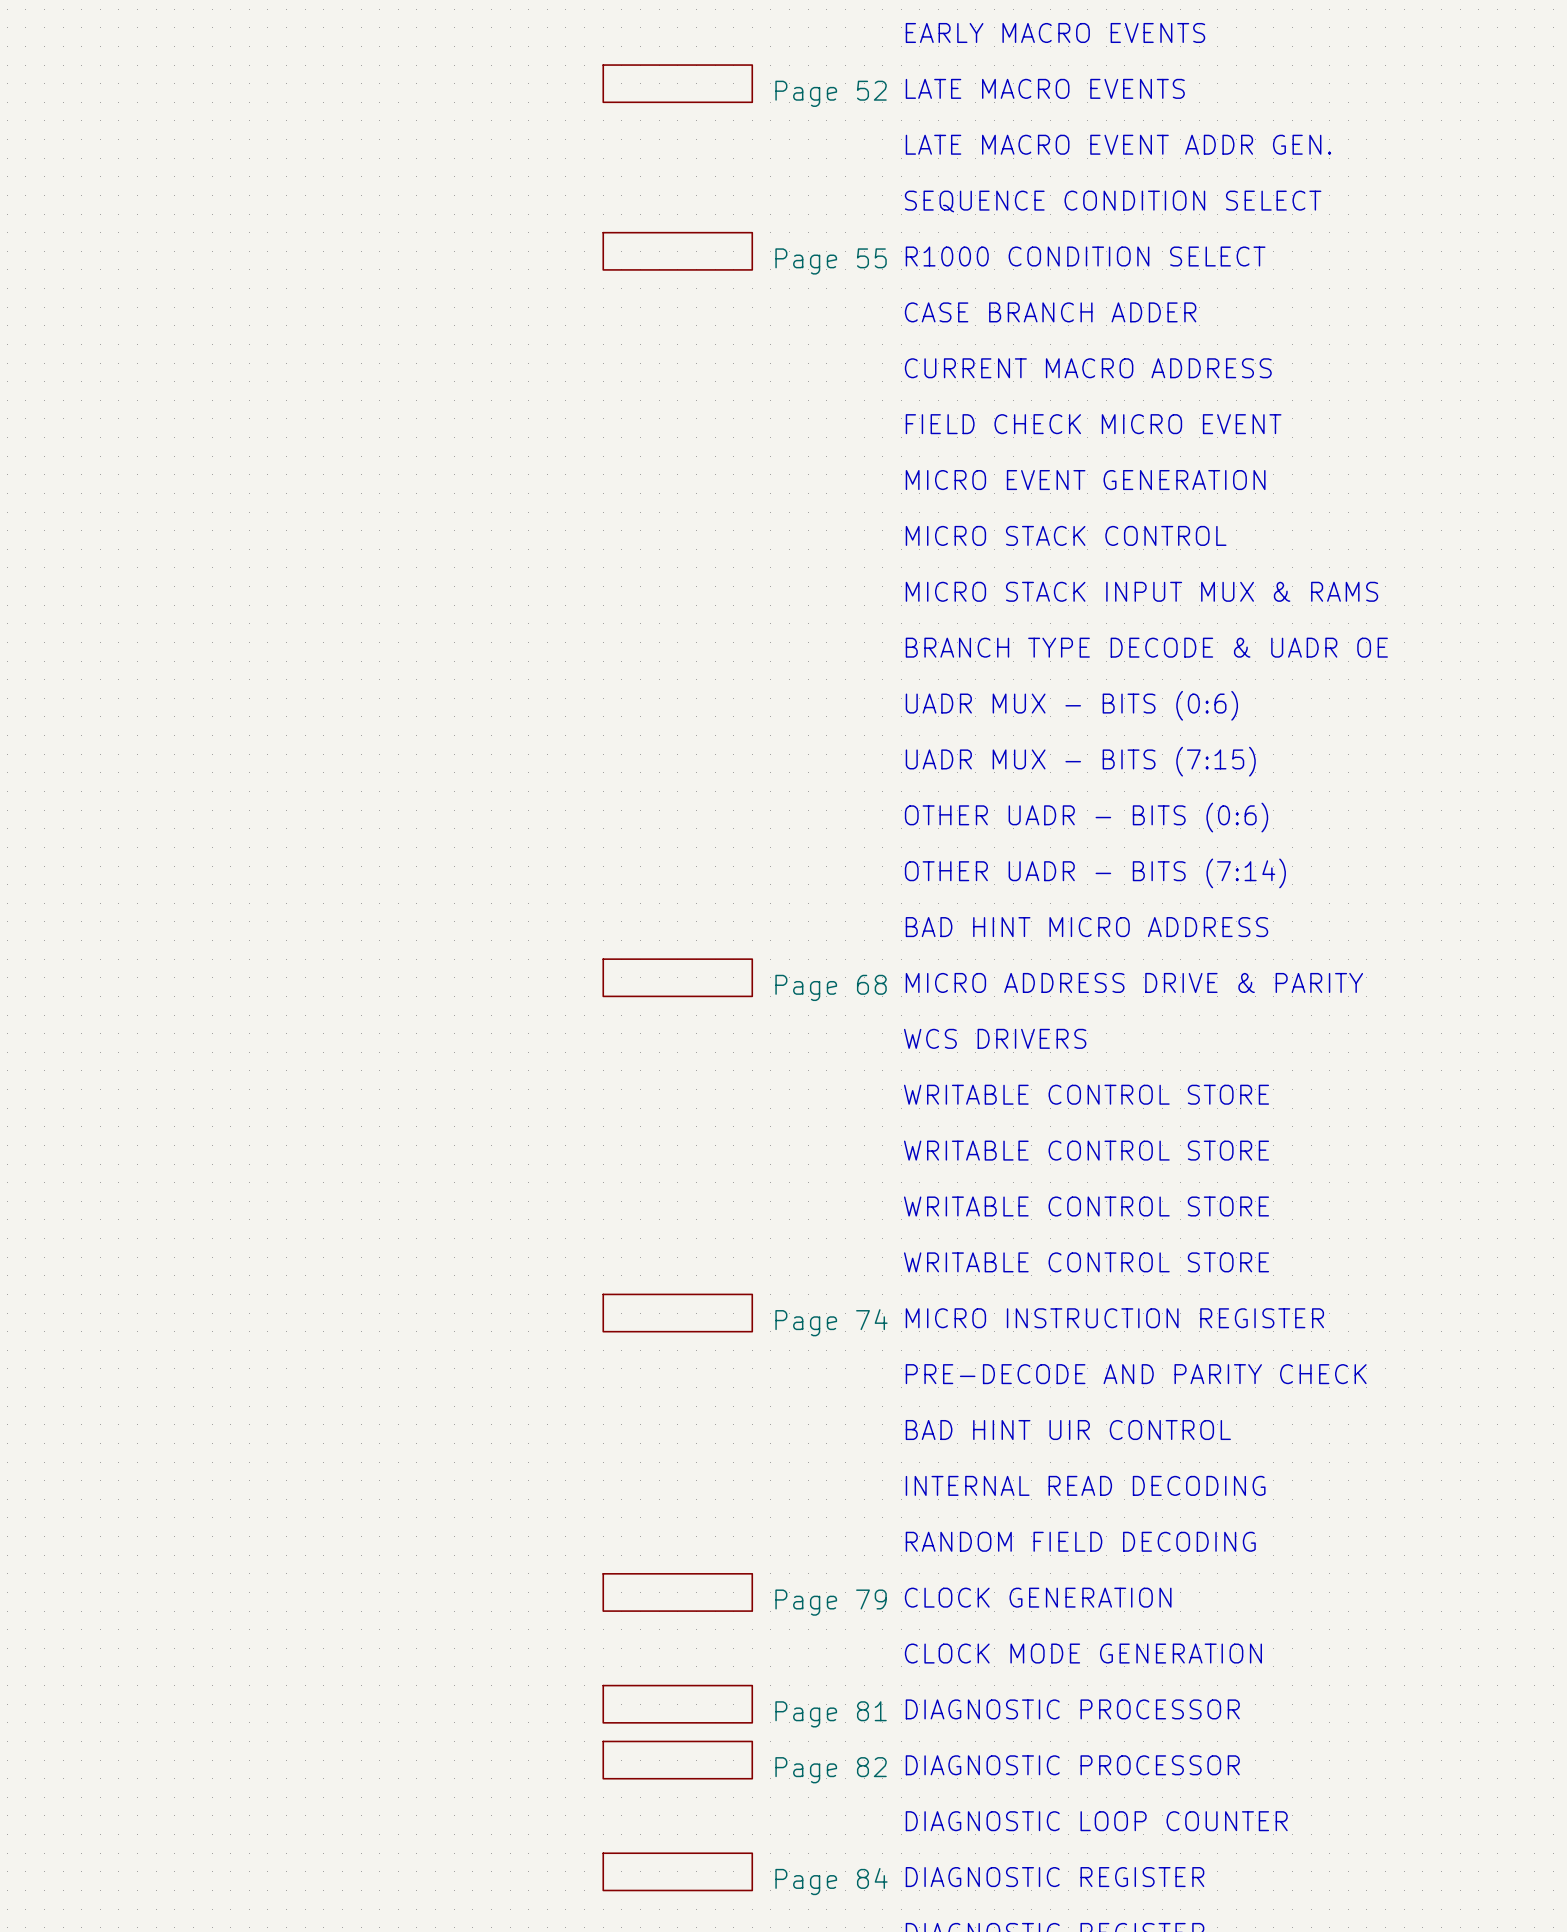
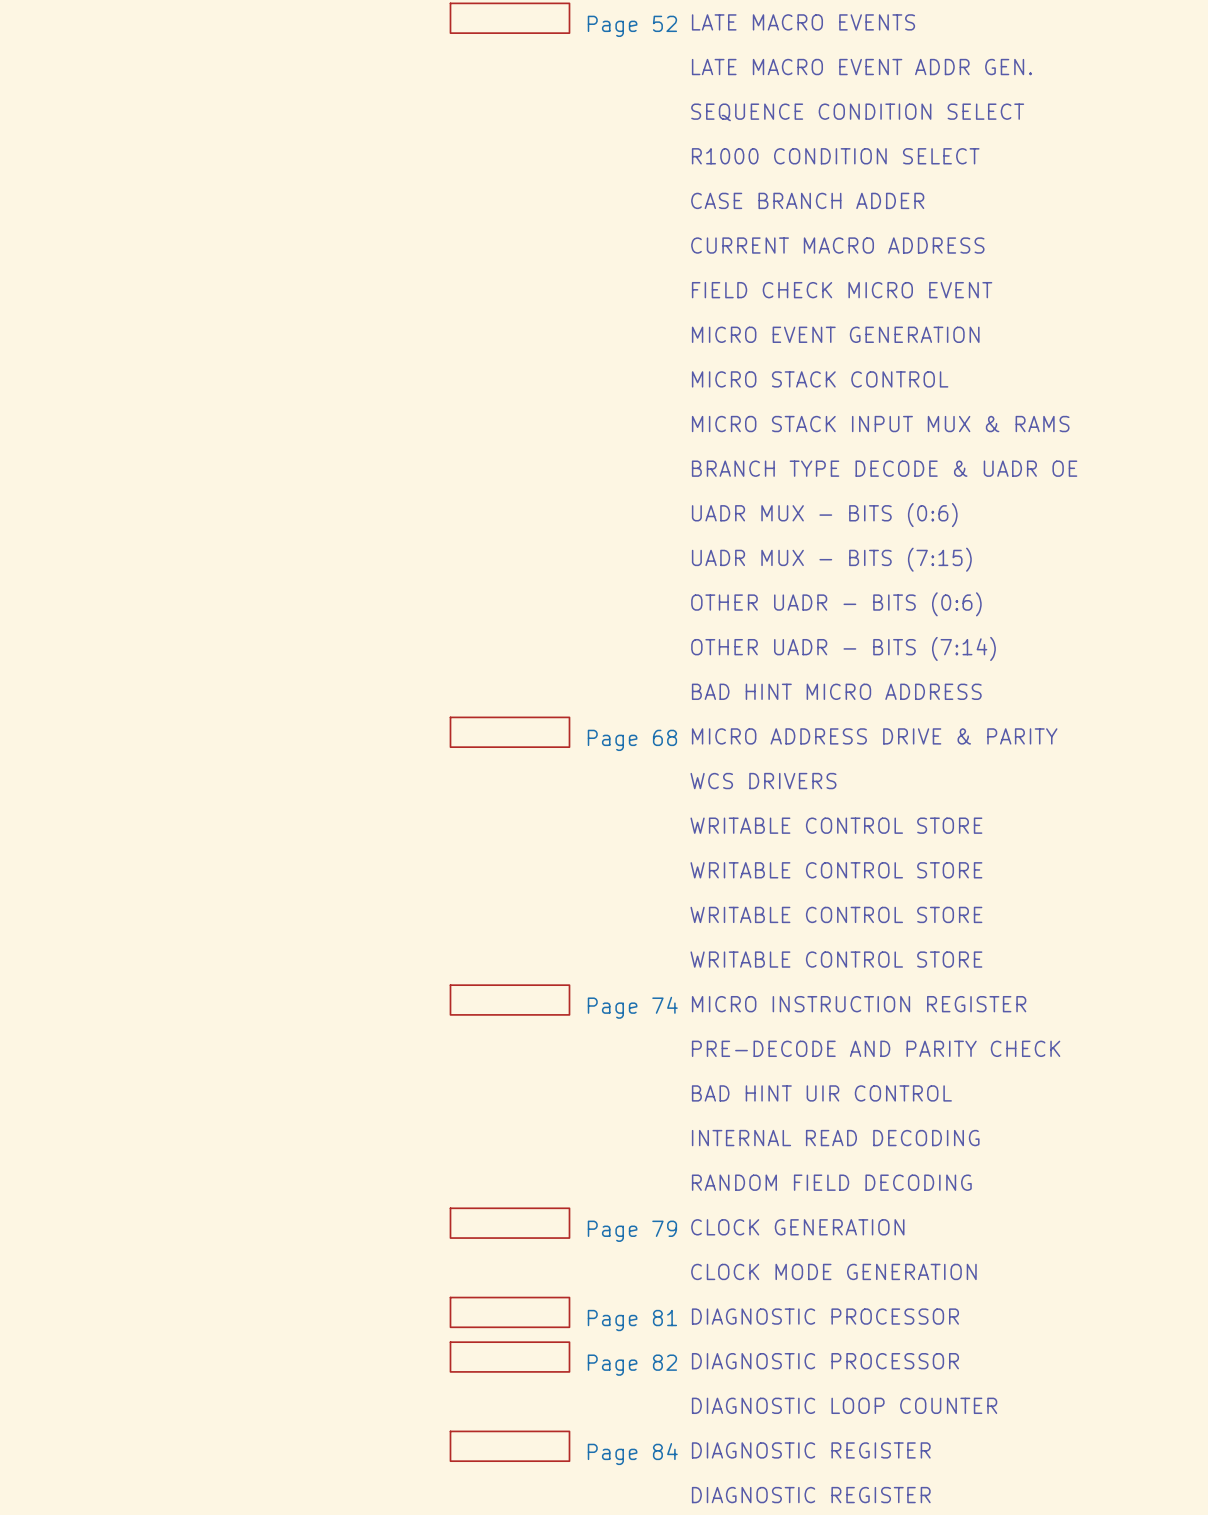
sheet Page 55: (677, 251) -> none

